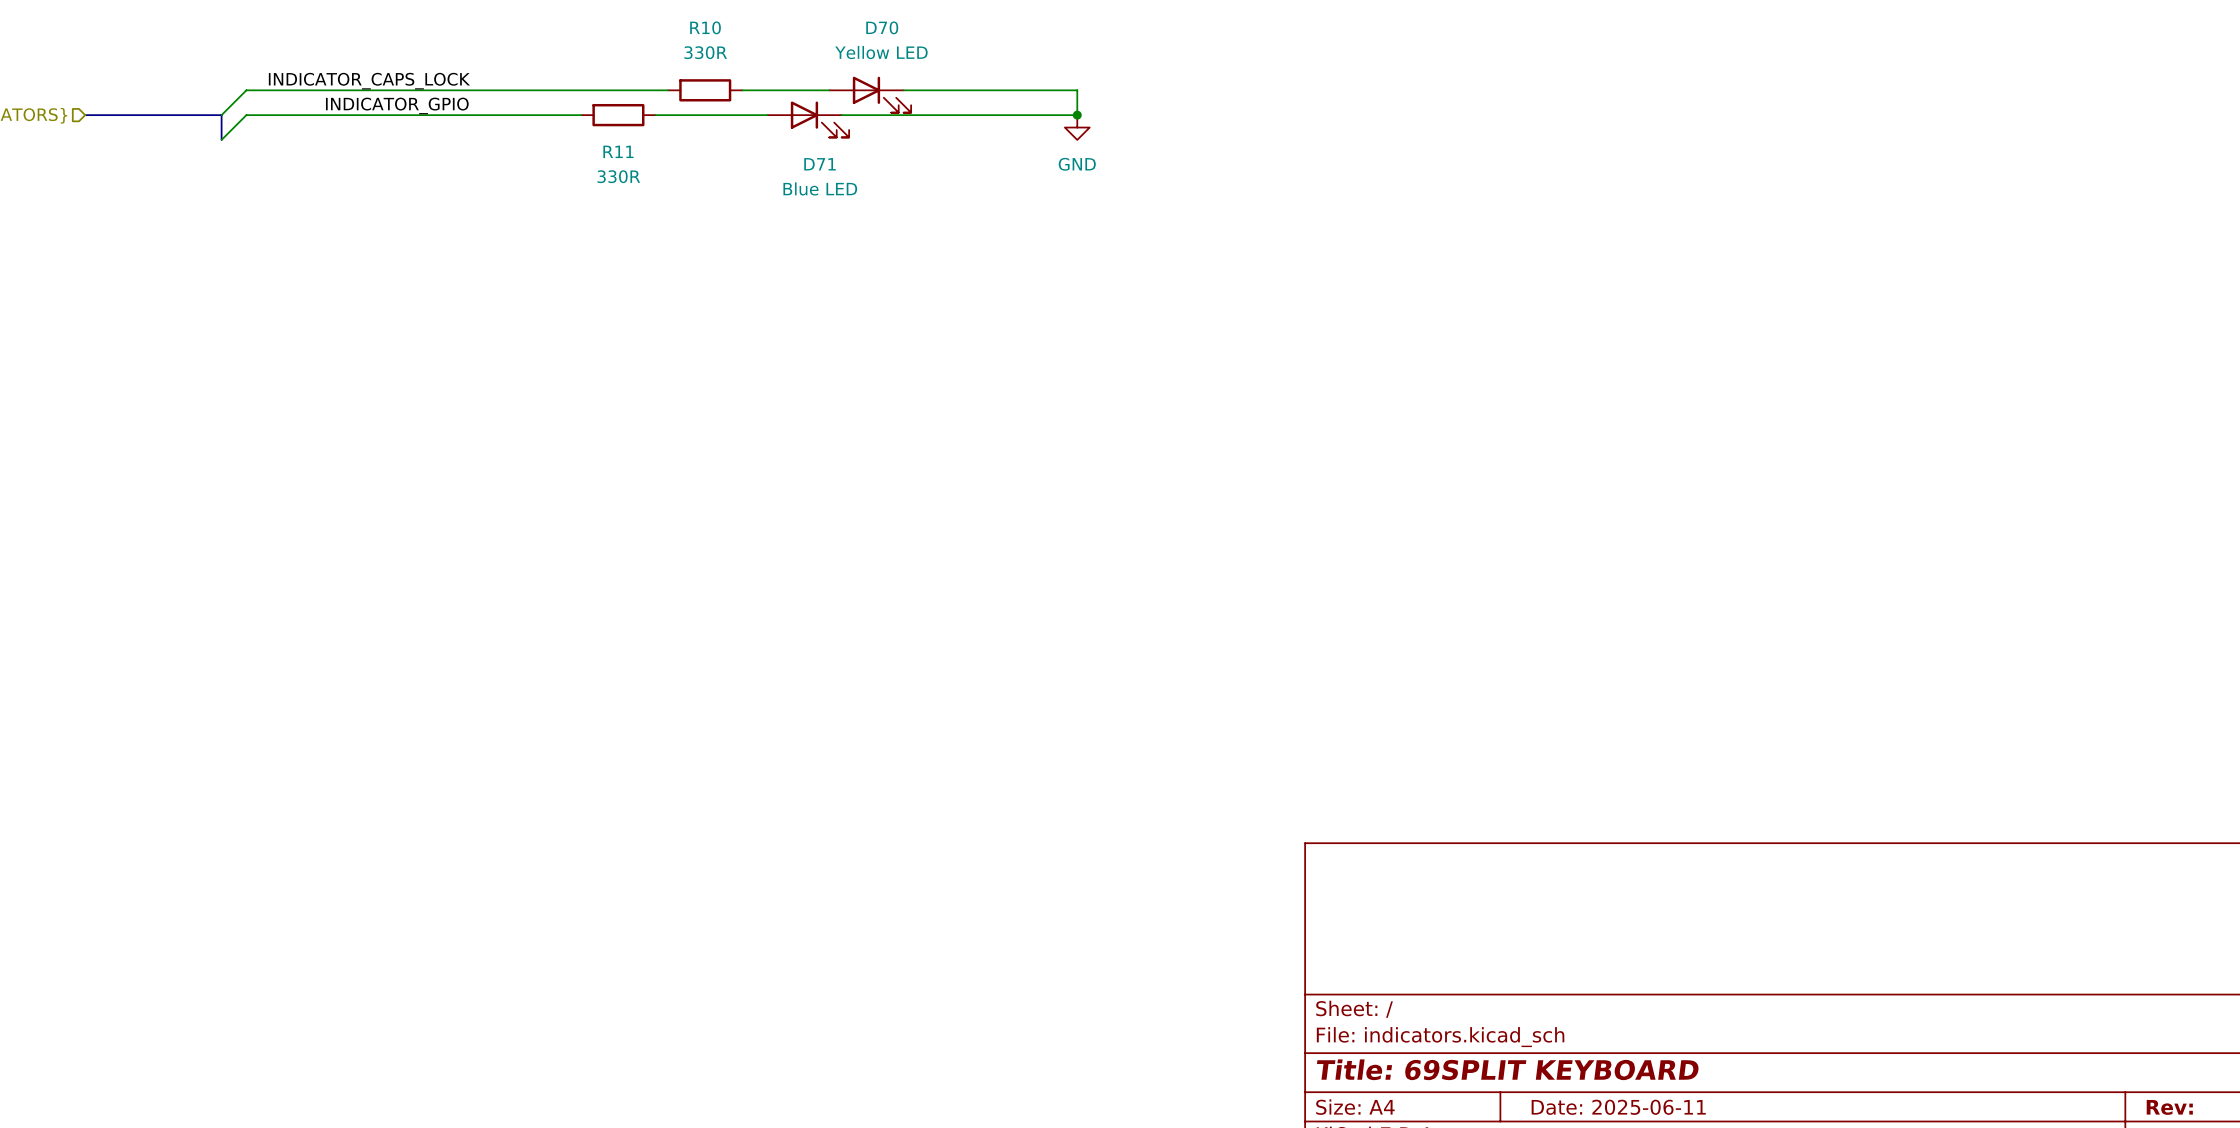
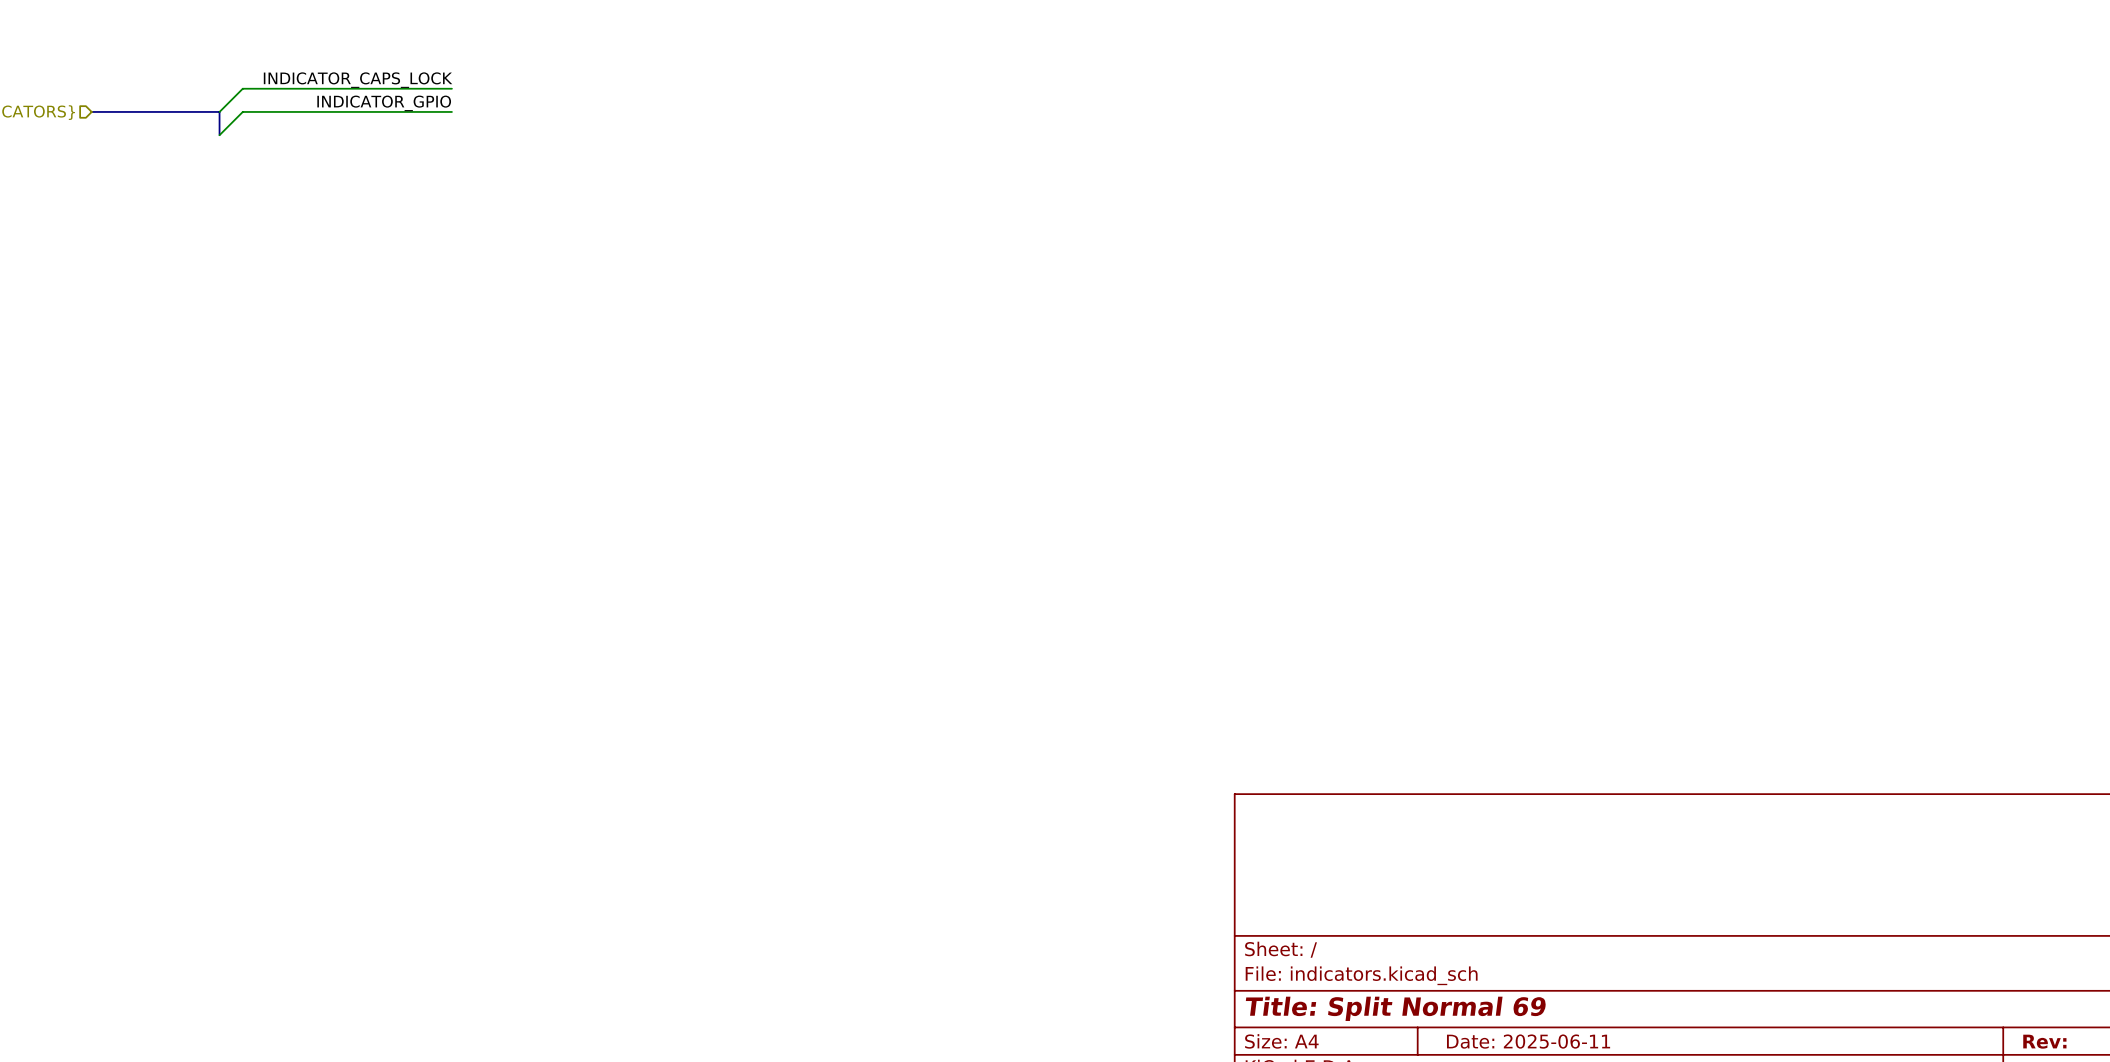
wire: (469, 90) (668, 90) -> none
R10: 330R (705, 90) -> none
wire: (742, 90) (829, 90) -> none
wire: (903, 90) (1077, 90) (1077, 115) (841, 115) -> none
D70: Yellow LED (870, 94) -> none
wire: (469, 115) (581, 115) -> none
R11: 330R (618, 115) -> none
wire: (655, 115) (767, 115) -> none
junction: (1077, 115) -> none
D71: Blue LED (808, 119) -> none
power symbol: GND (1077, 127) -> none
title block: Title: 69SPLIT KEYBOARD (1507, 1069) -> Title: Split Normal 69 (1395, 1008)

